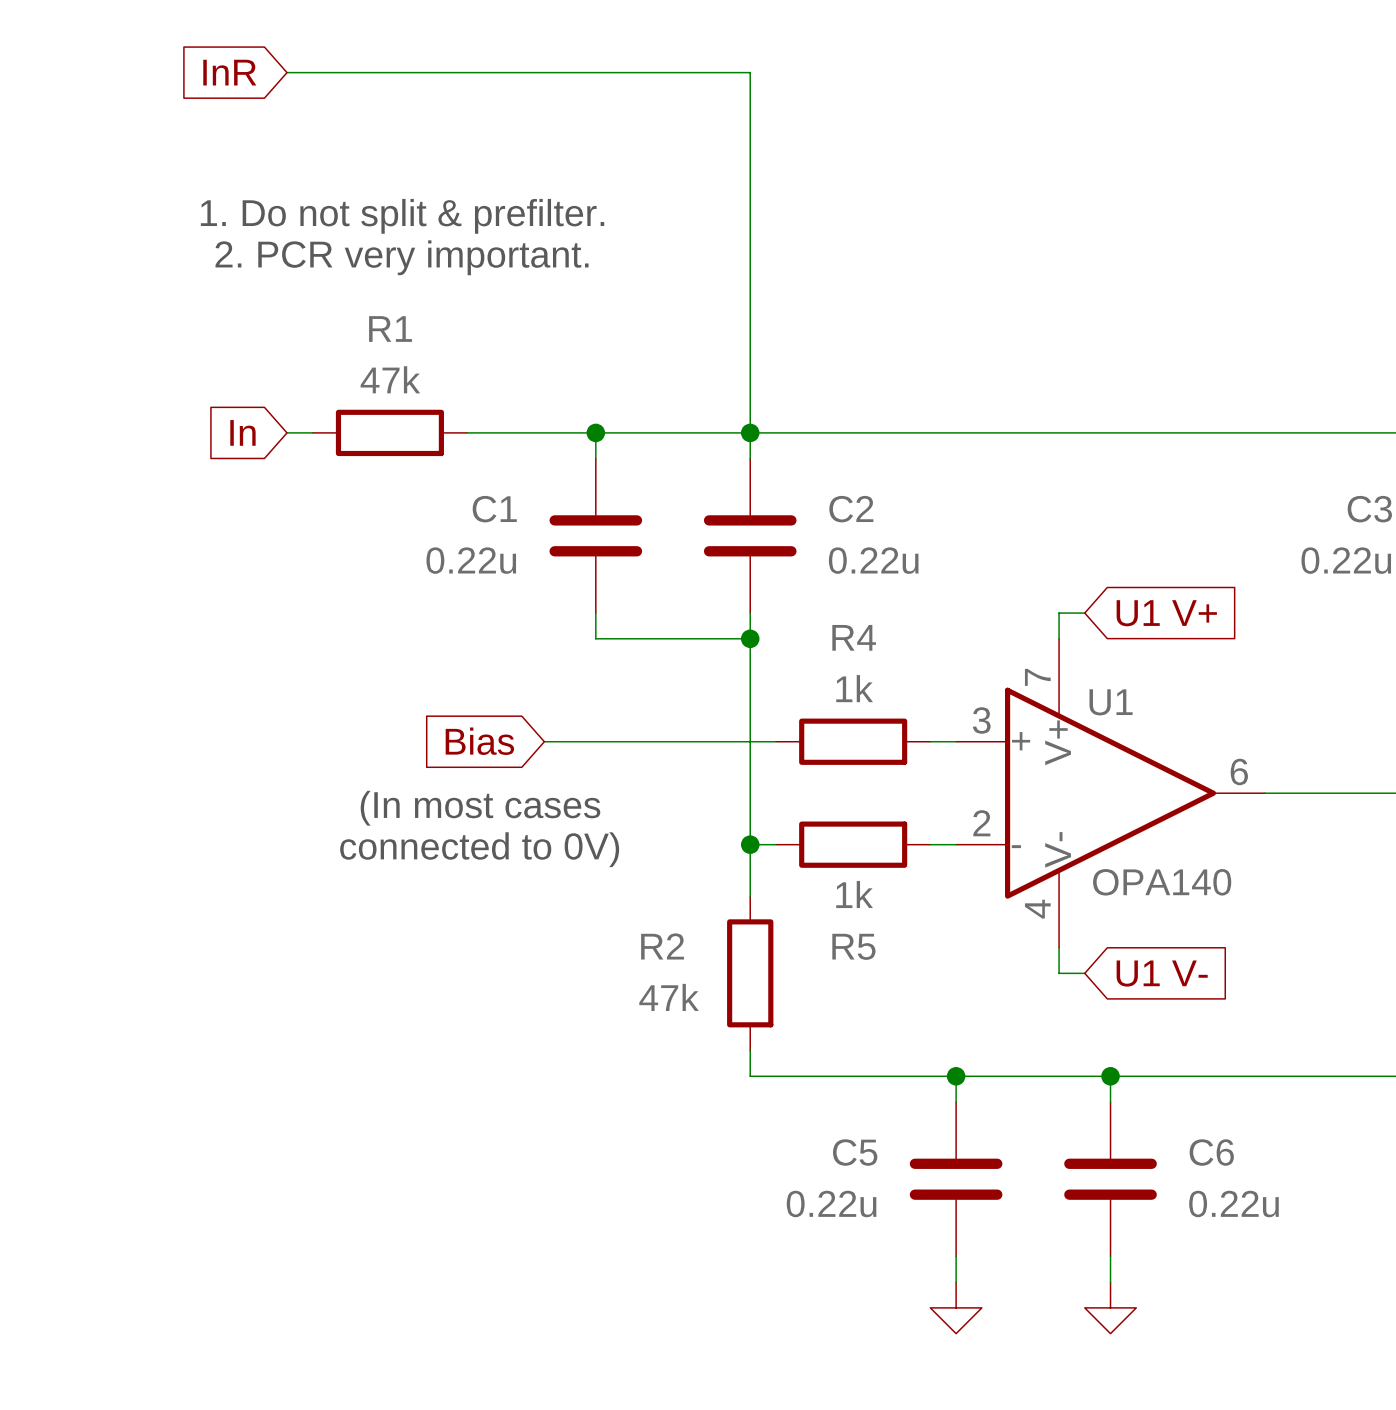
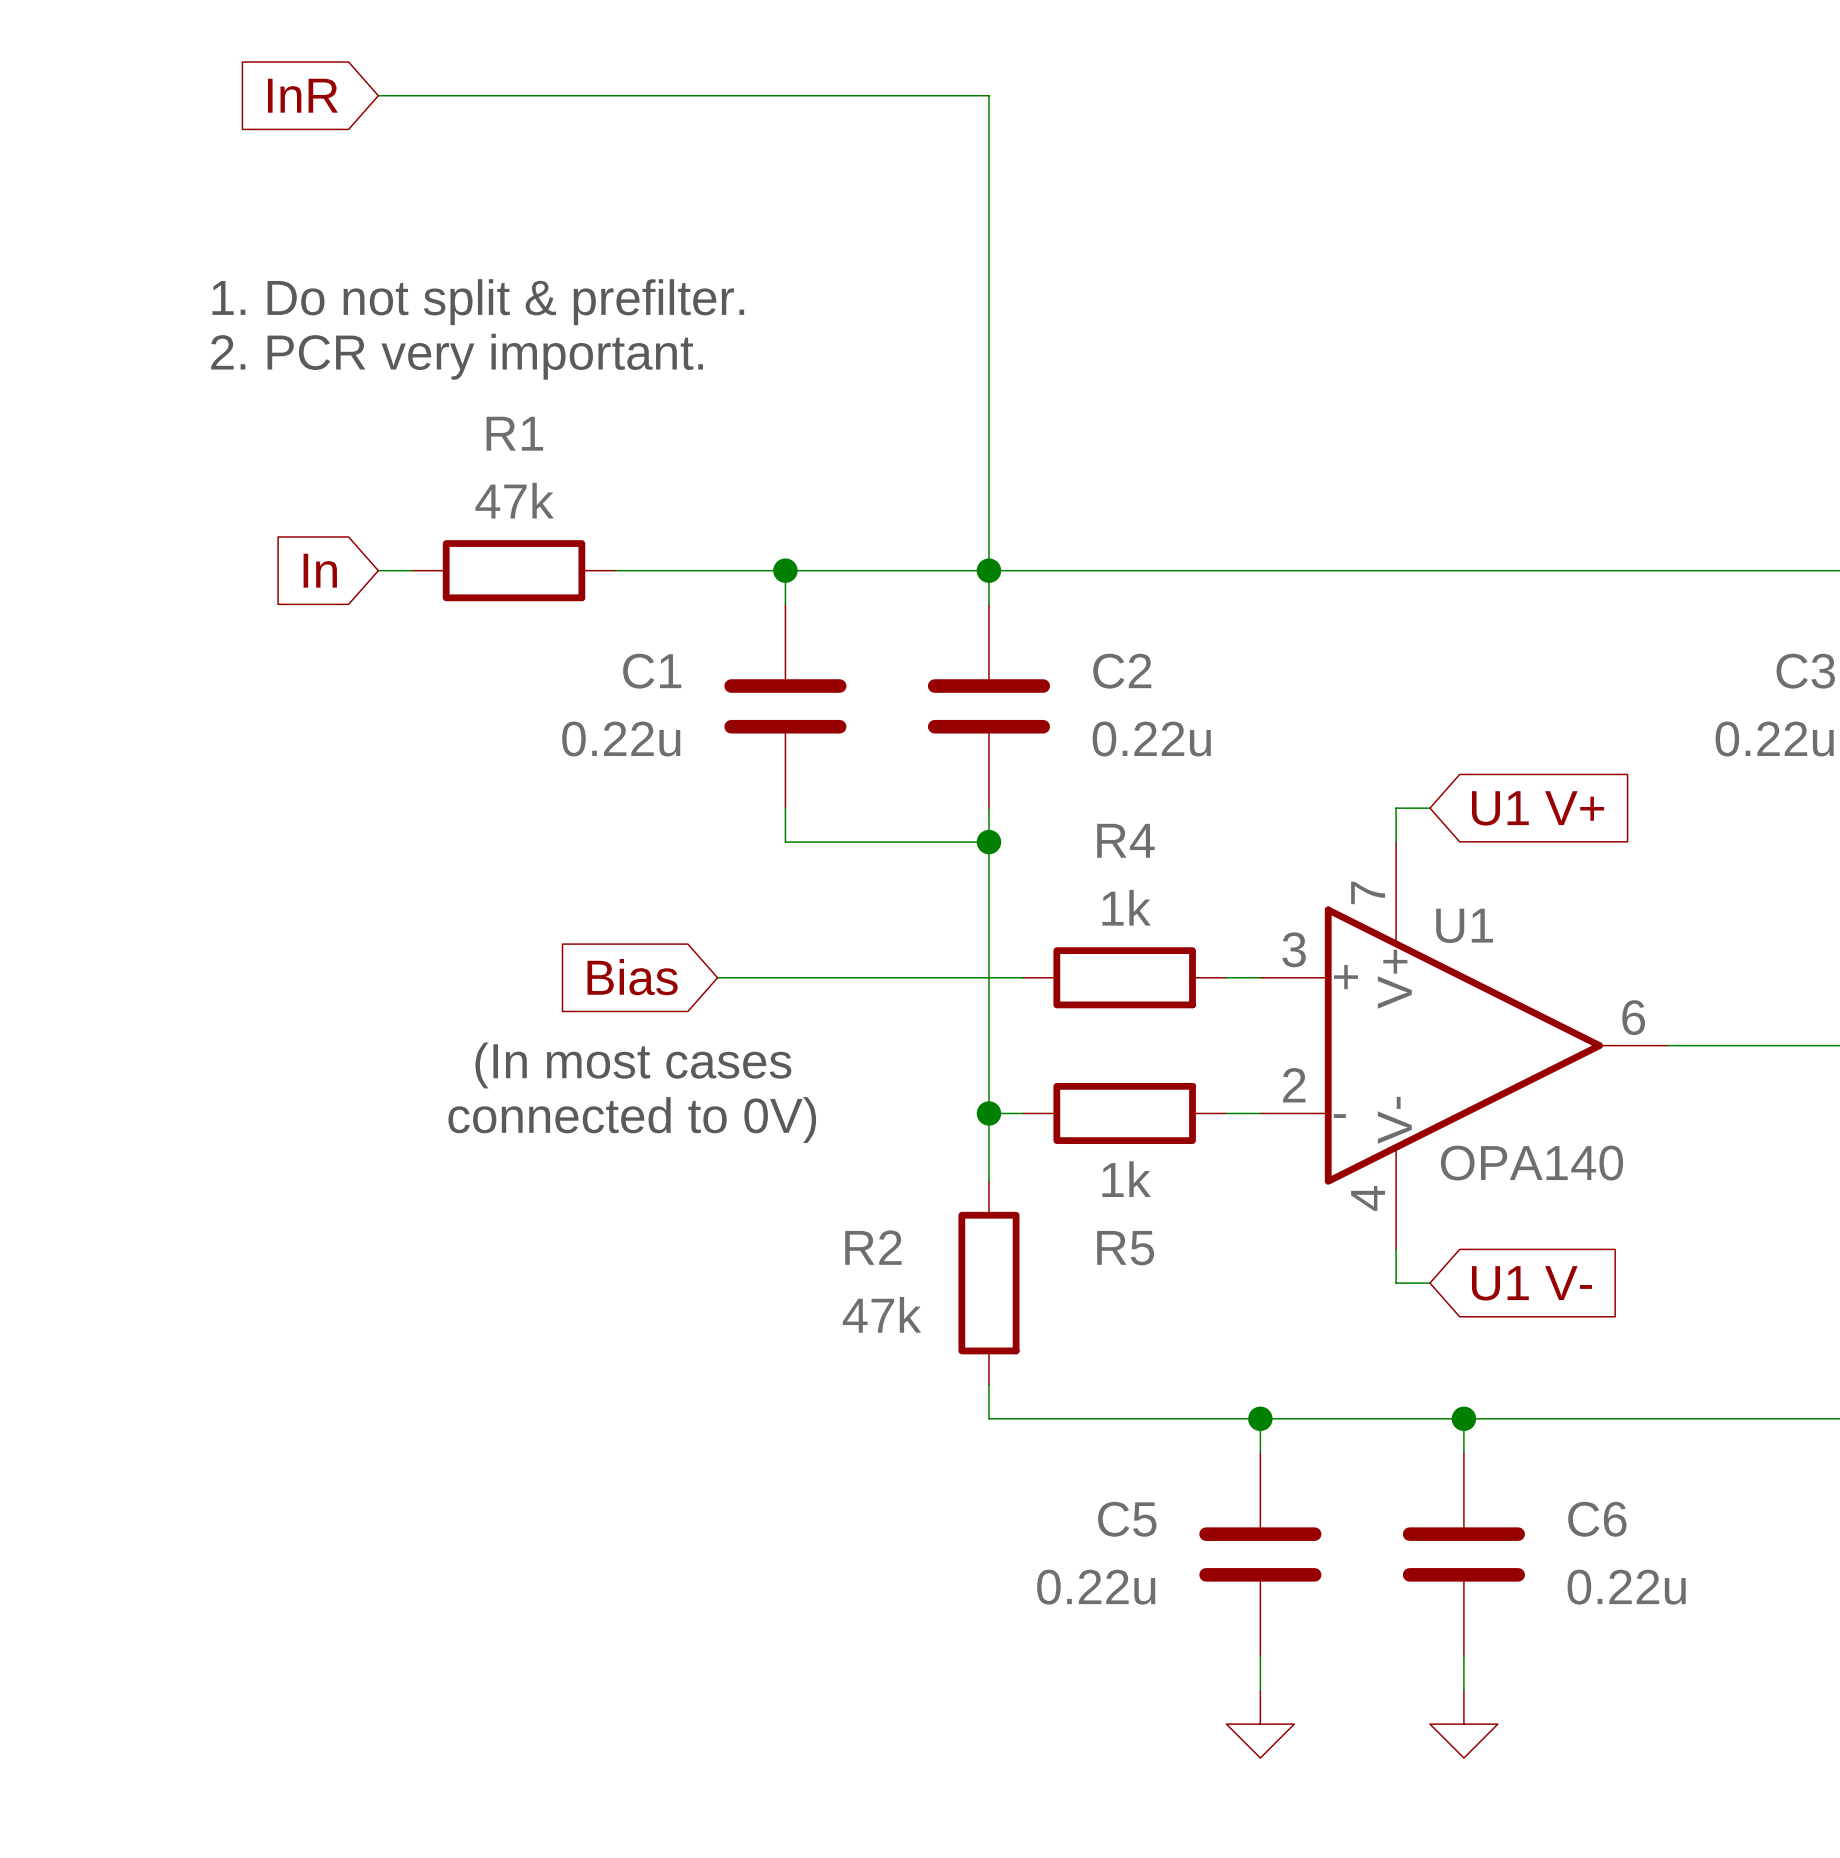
text position: 1. Do not split & prefilter. (402, 216) -> 1. Do not split & prefilter. (478, 302)
text position: 2. PCR very important. (402, 257) -> 2. PCR very important. (457, 356)

